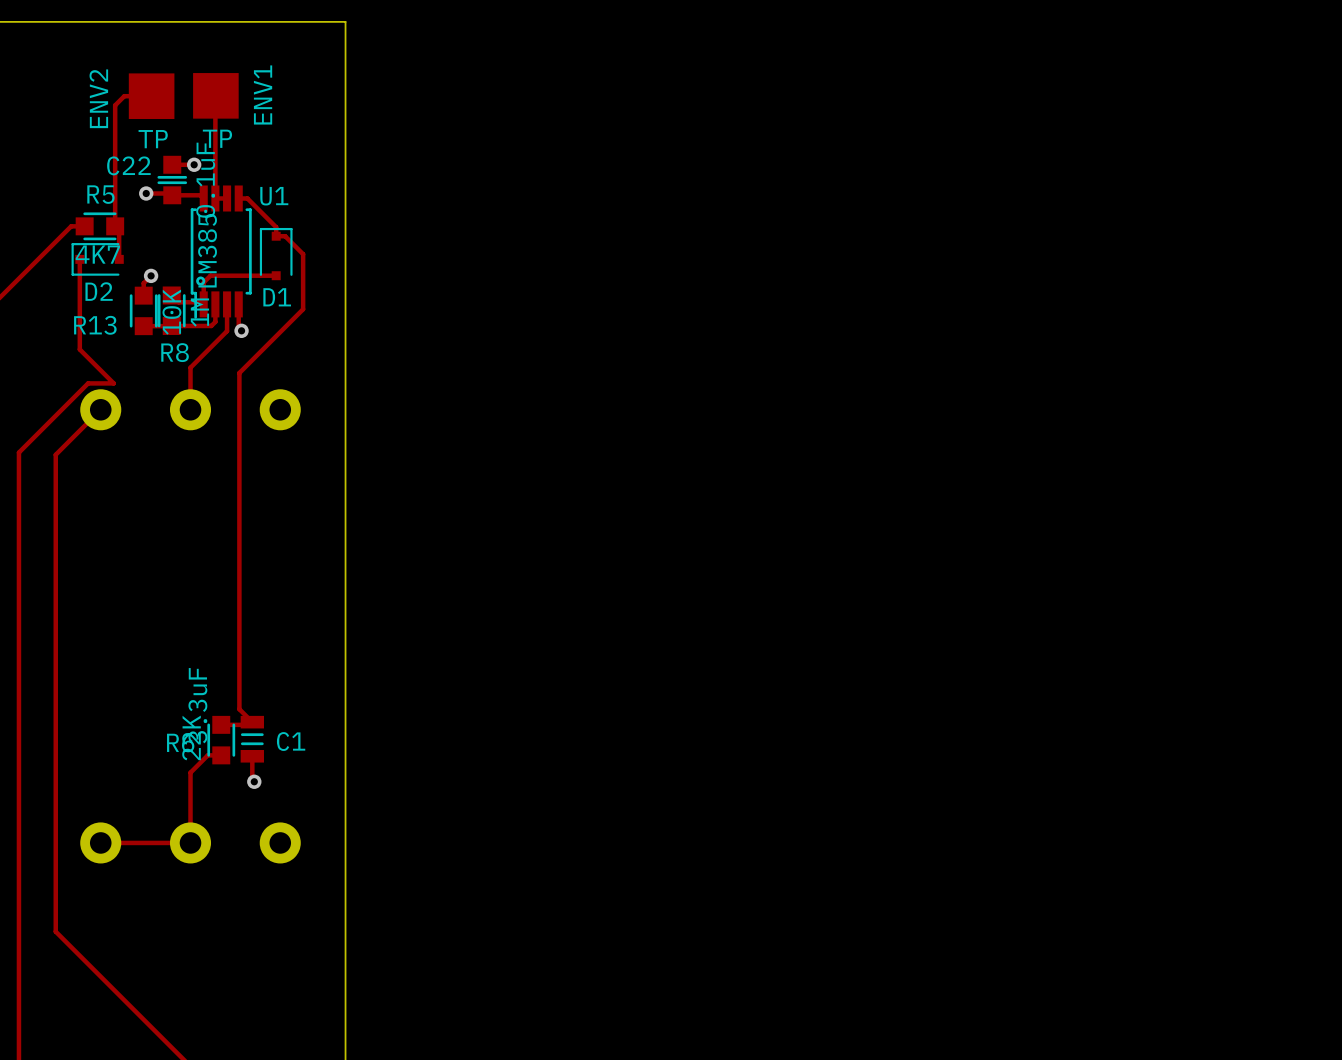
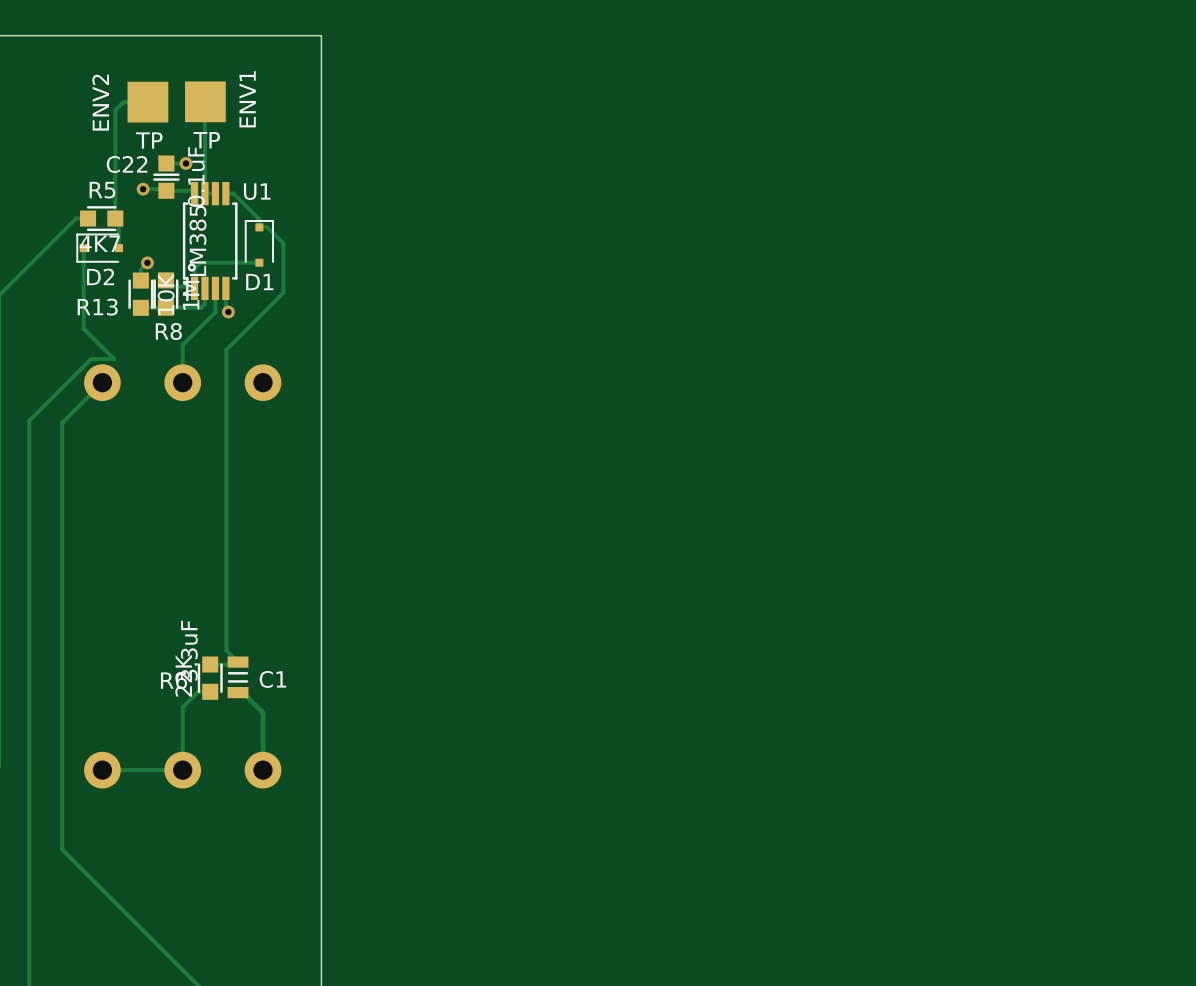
track: (252, 756) (252, 779) (254, 781) -> (238, 692) (242, 692) (263, 712) (263, 770)
via: (254, 781) -> none

